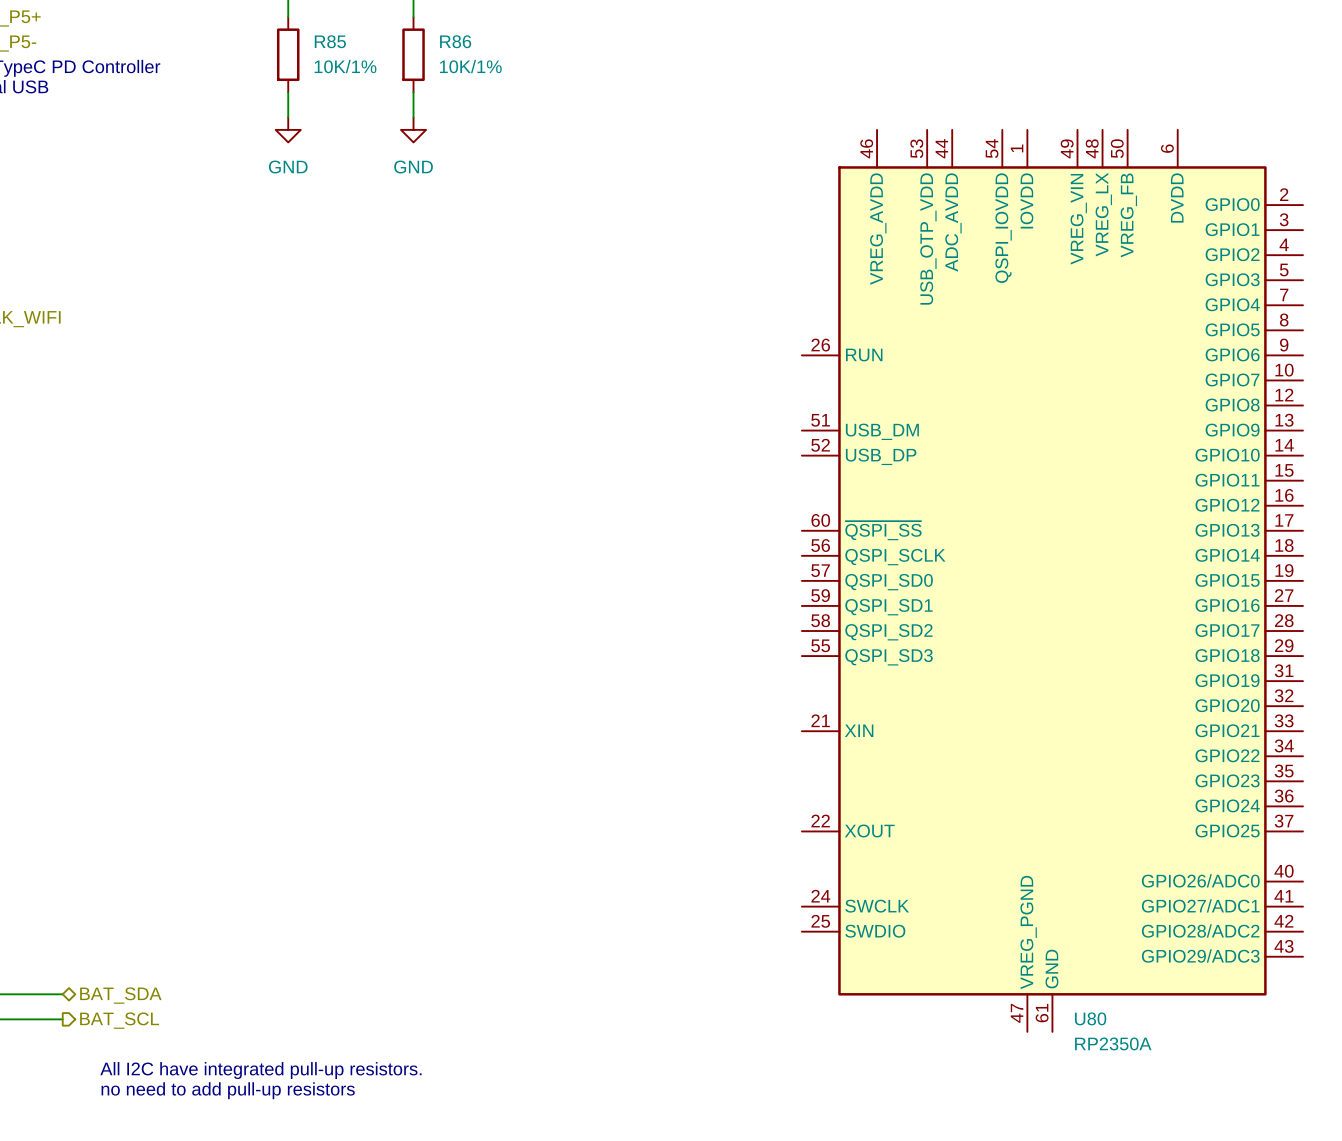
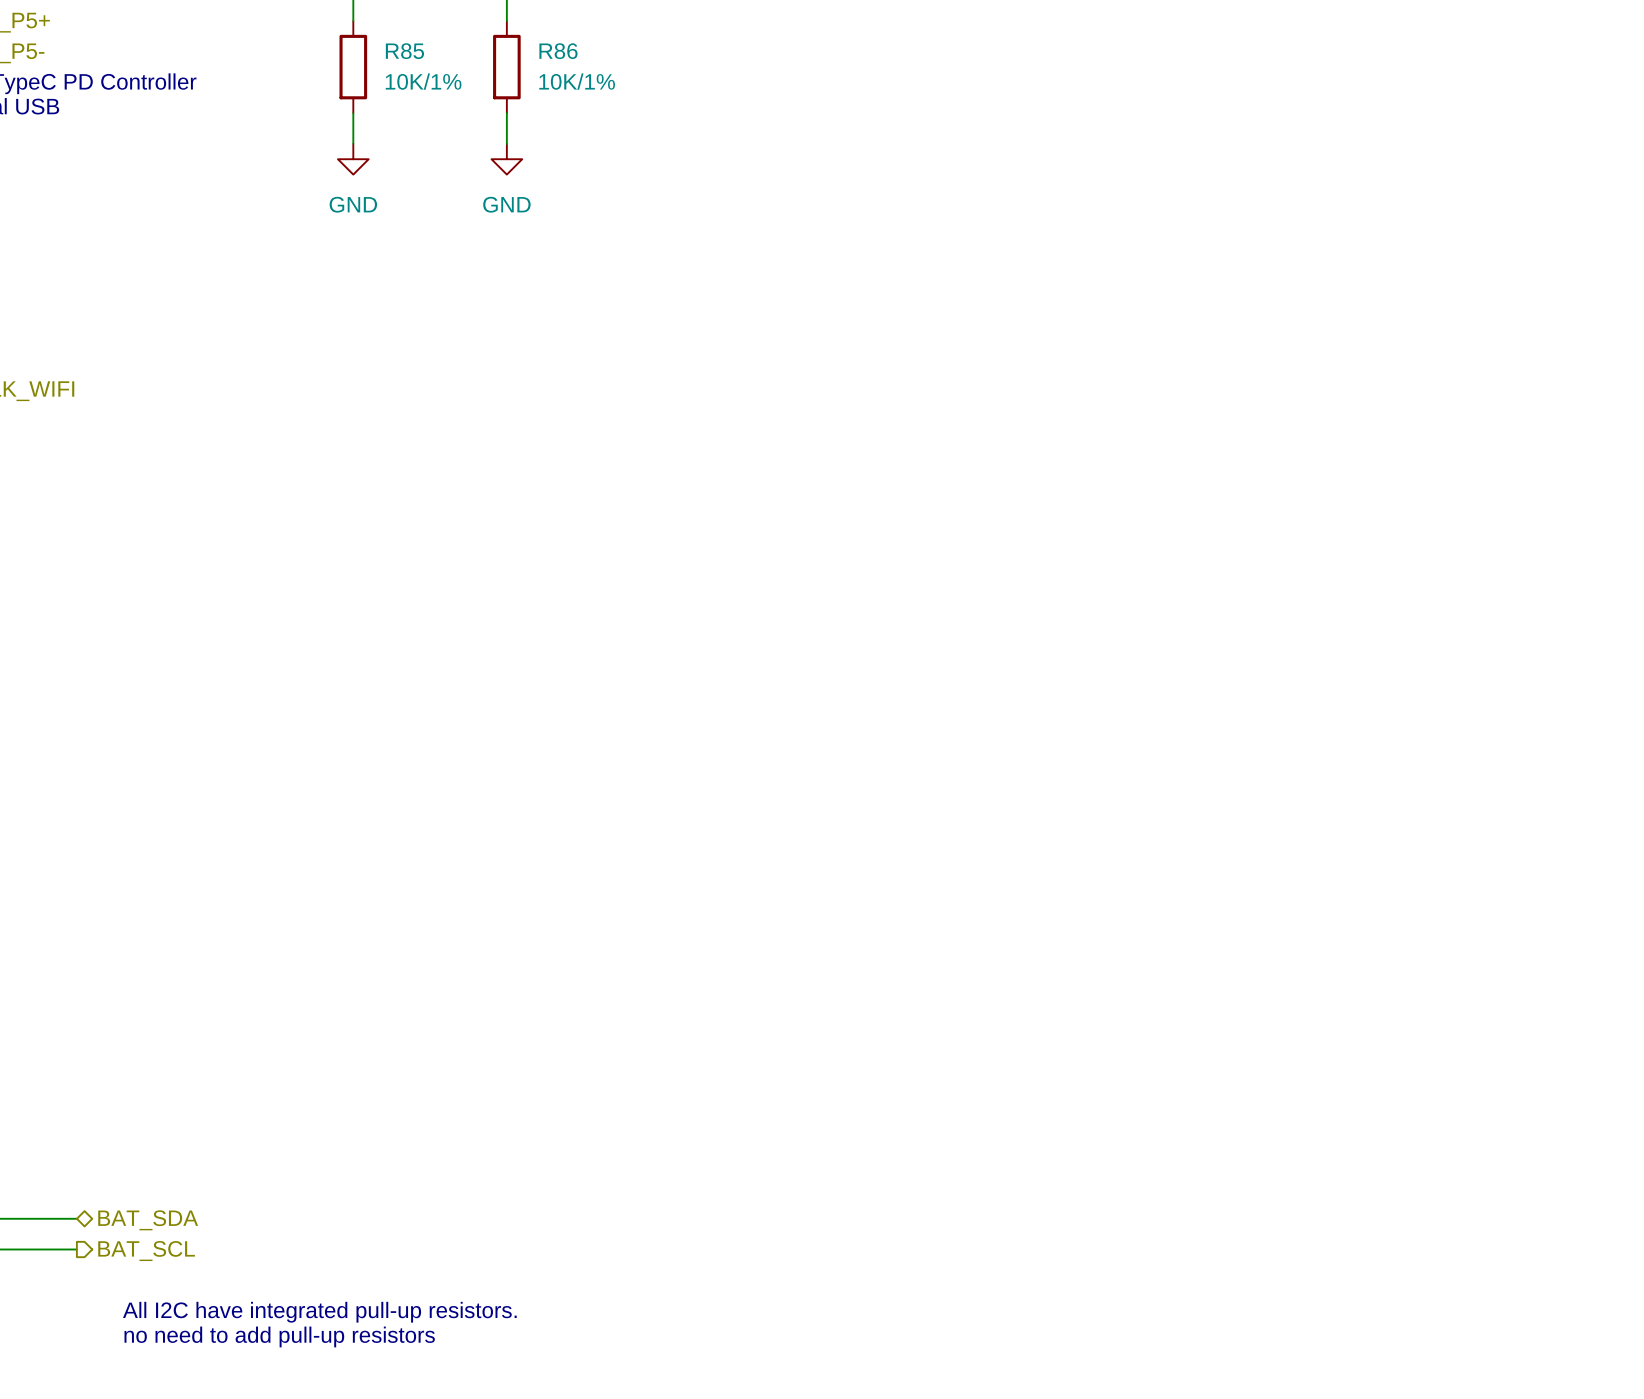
U80: RP2350A (1052, 580) -> none

